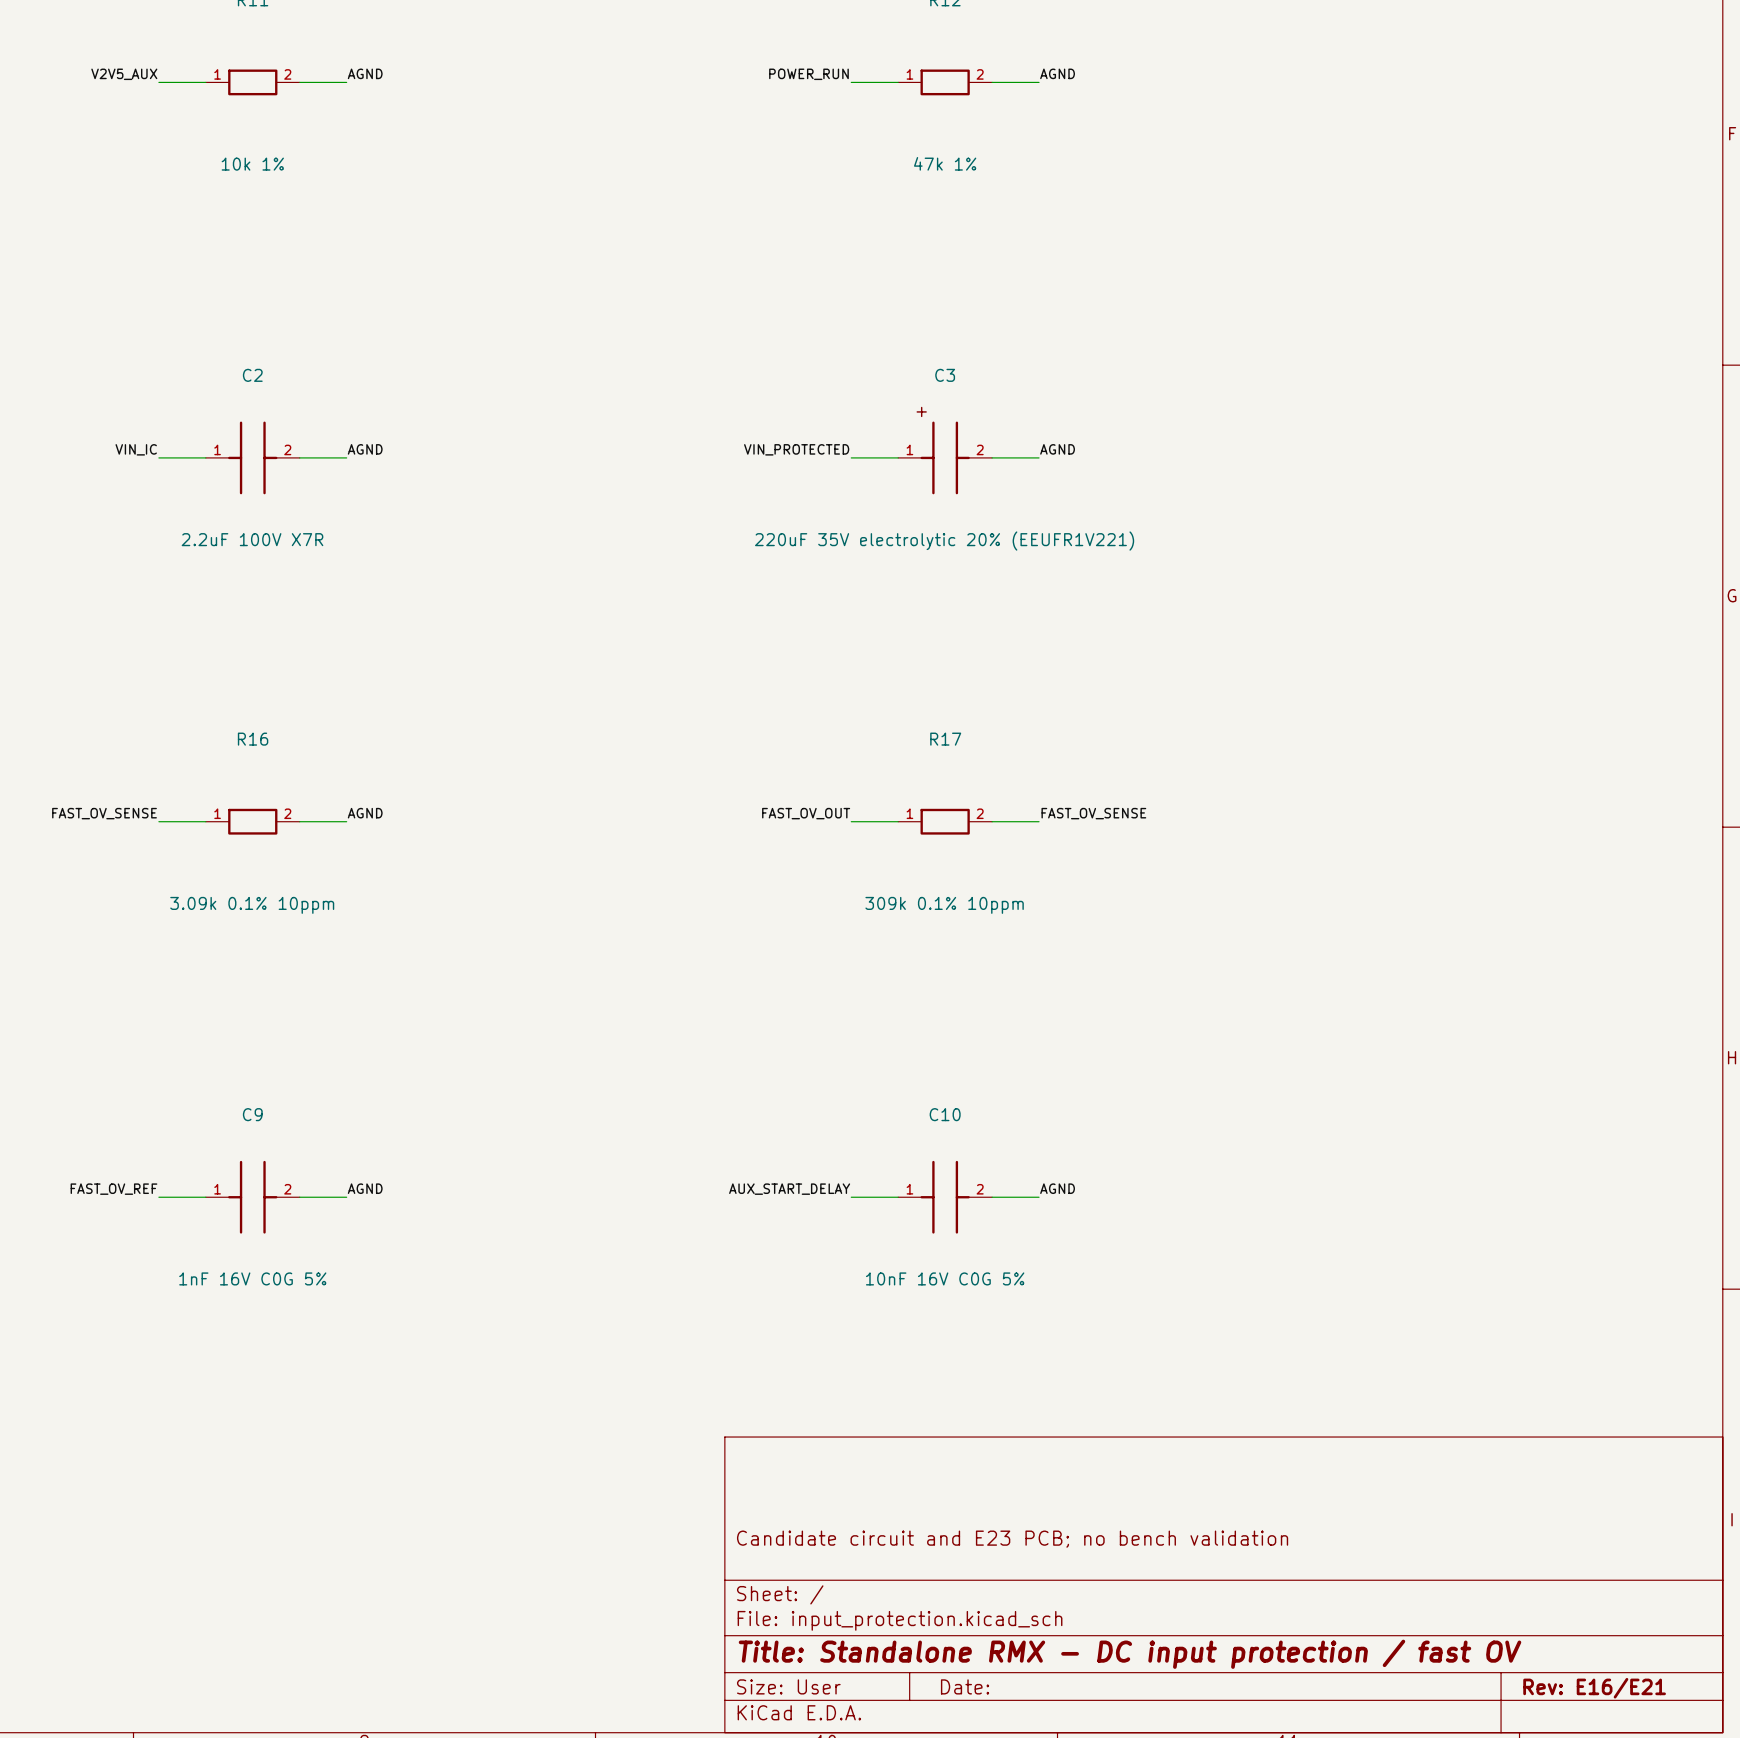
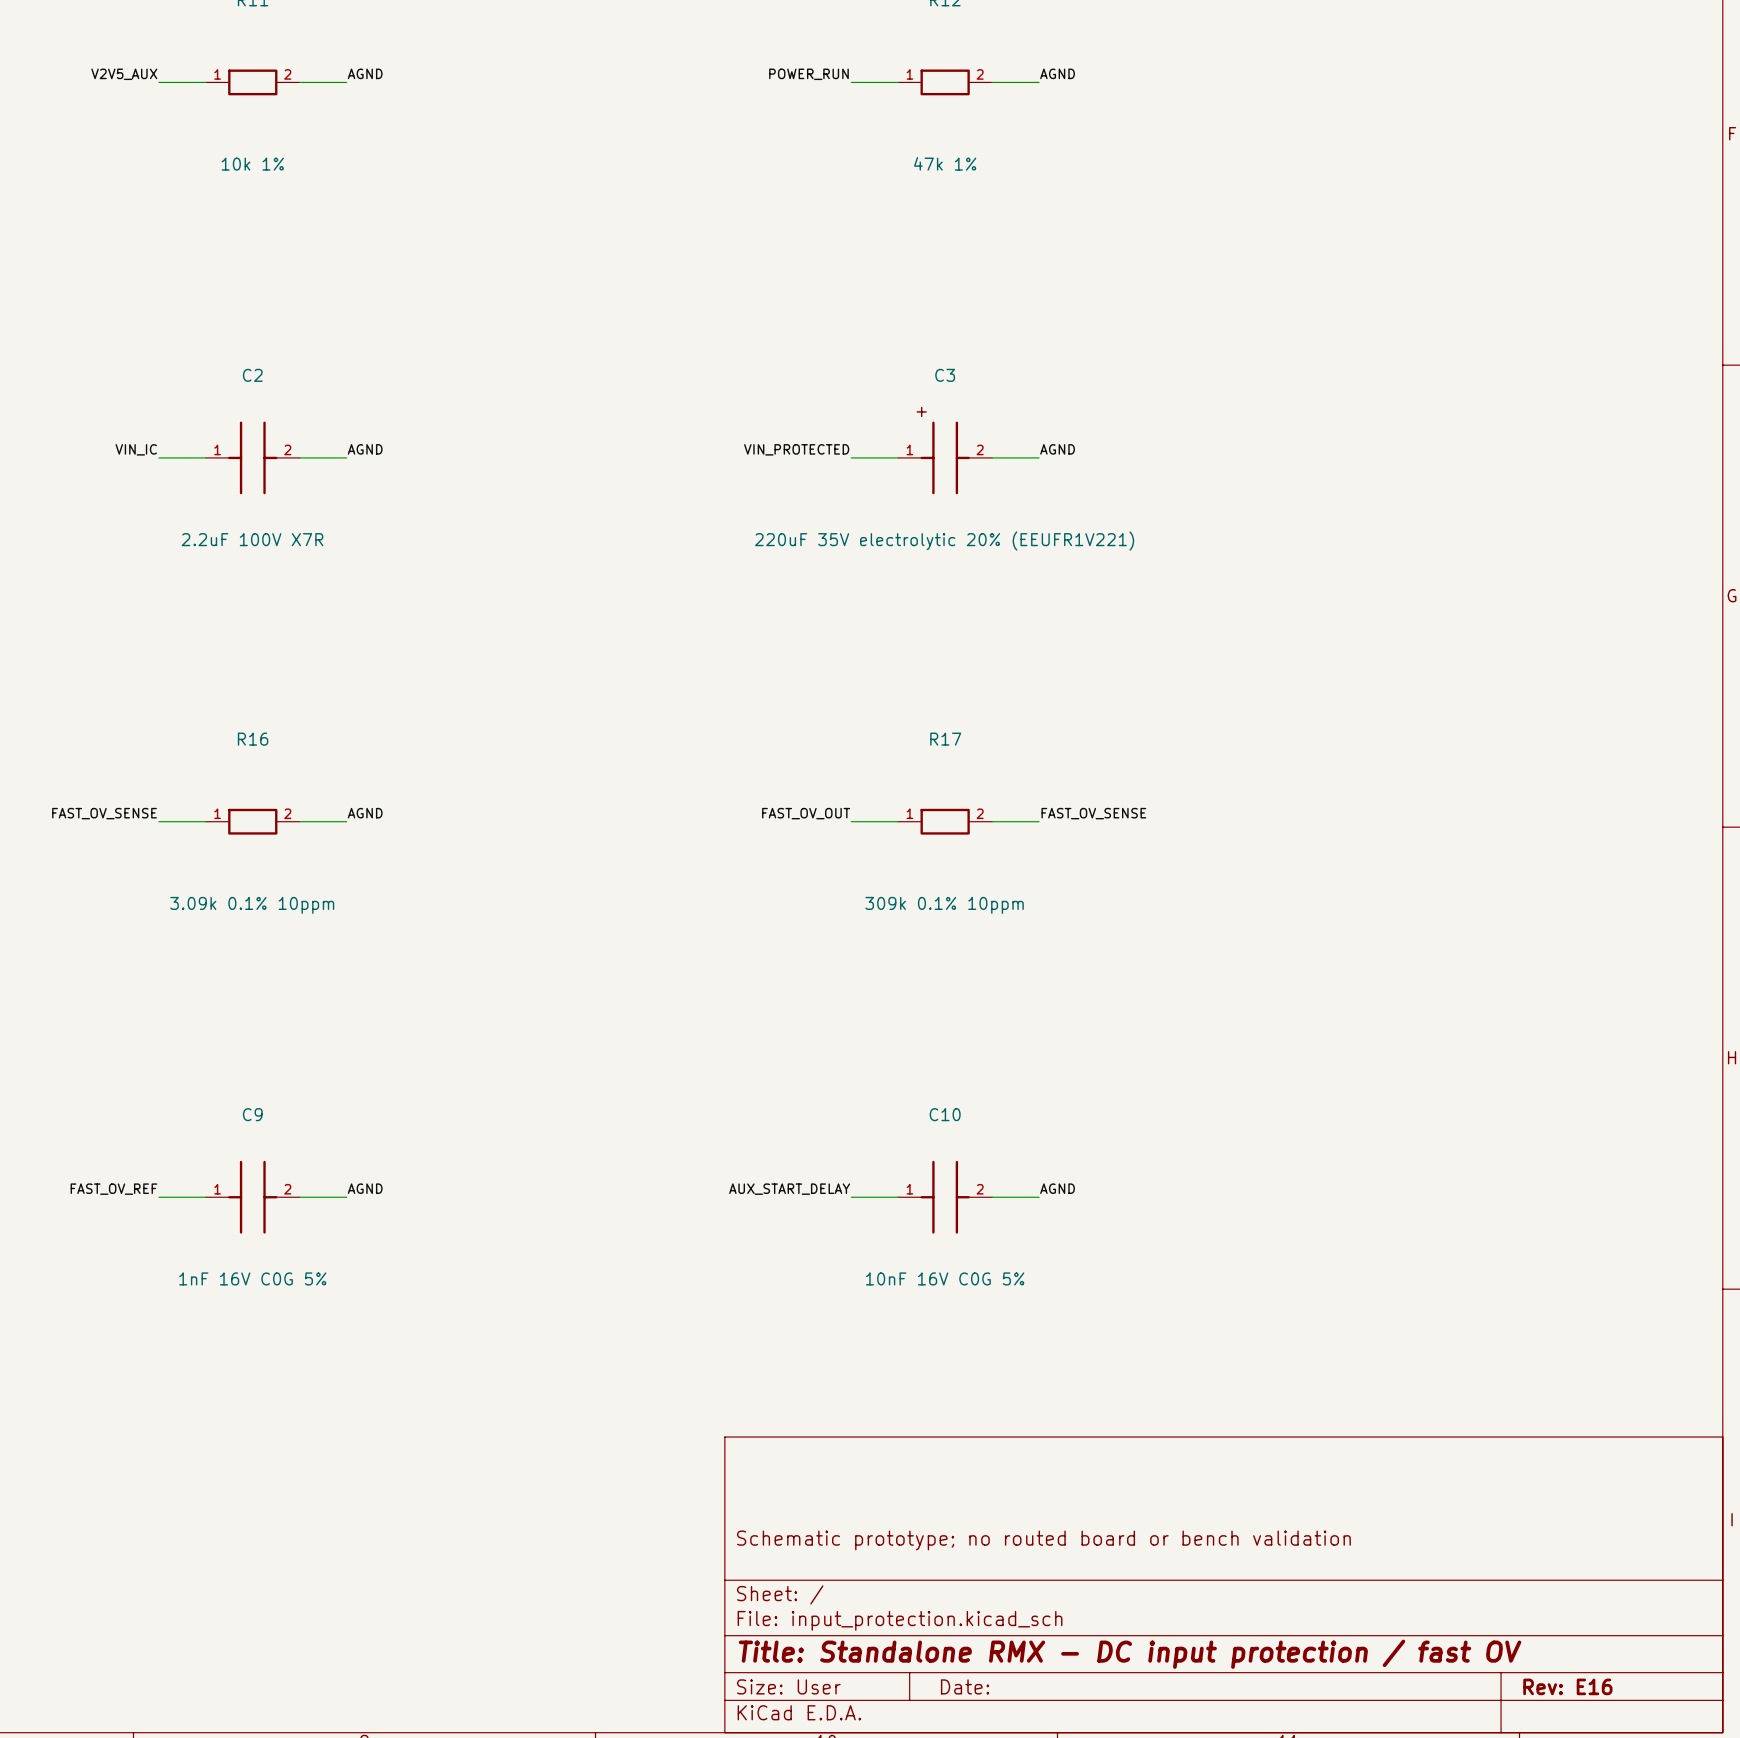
title block: Candidate circuit and E23 PCB; no bench validation (1012, 1539) -> Schematic prototype; no routed board or bench validation (1043, 1540)
title block: Rev: E16/E21 (1594, 1688) -> Rev: E16 (1567, 1686)

